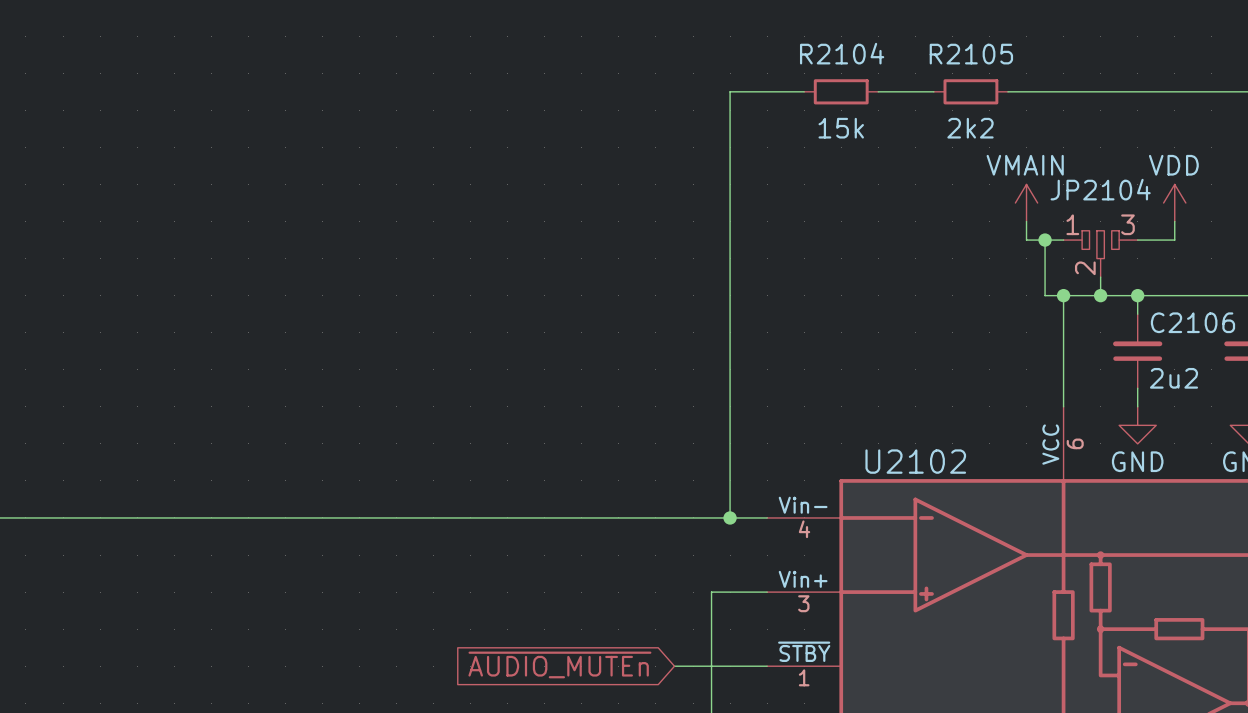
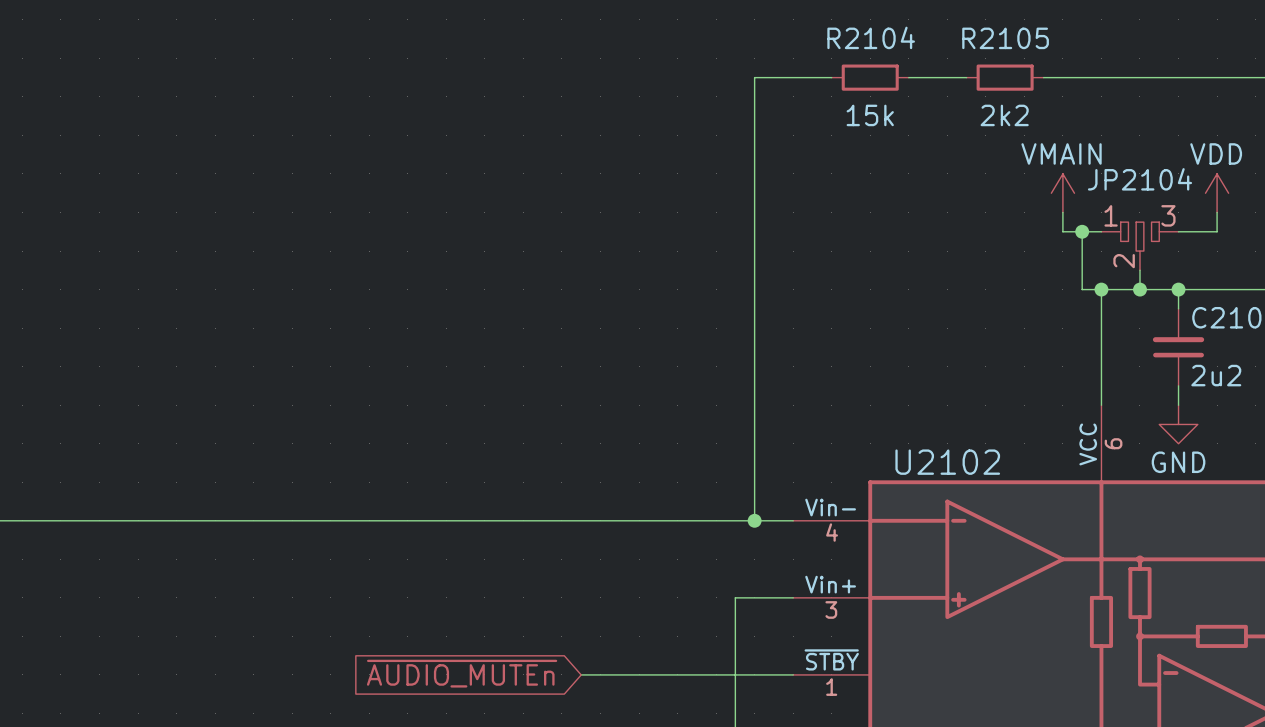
global label position: ~{AUDIO_MUTEn} (559, 664) -> ~{AUDIO_MUTEn} (462, 673)
wire: none -> (581, 674) (696, 674)

